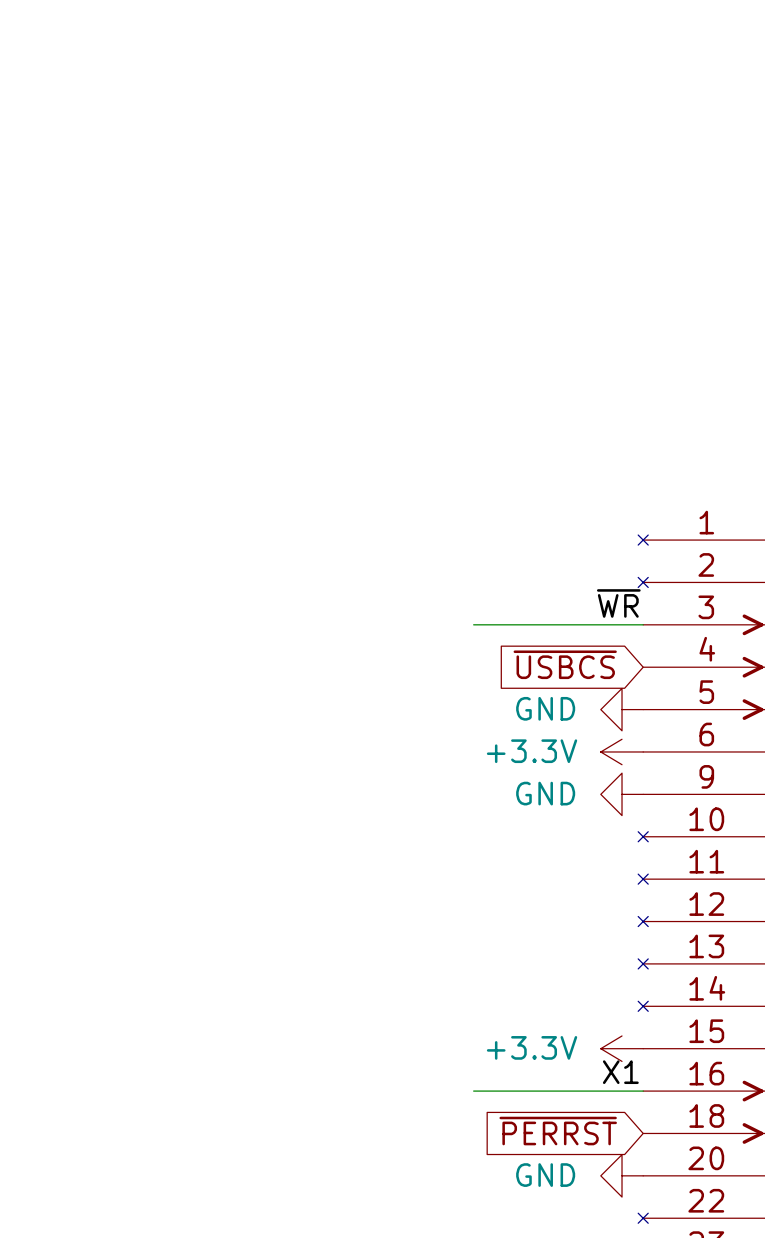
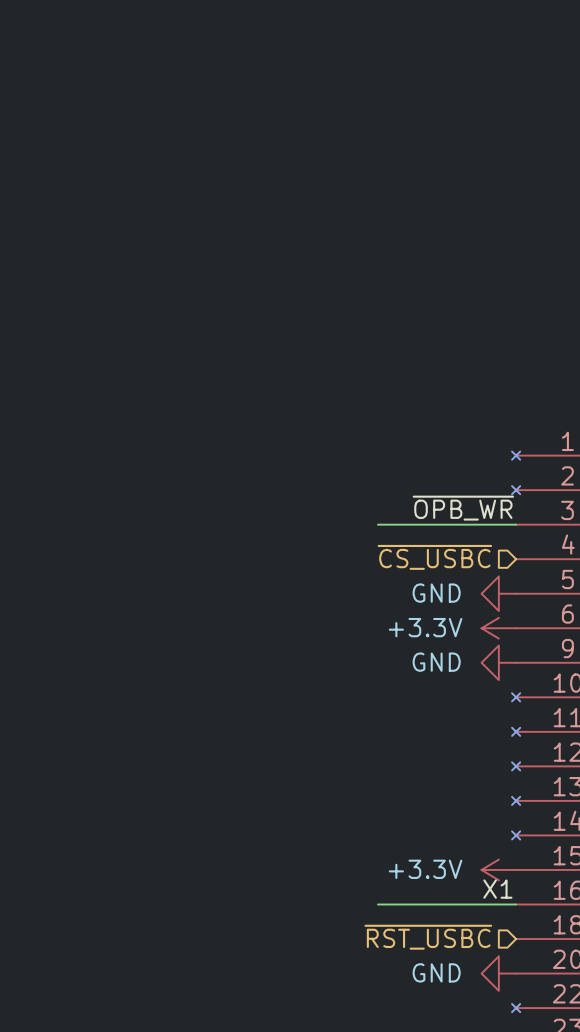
label: ~{WR} (618, 603) -> ~{OPB_WR} (463, 508)
hierarchical label: none -> ~{CS_USBC} (434, 557)
global label: ~{USBCS} (565, 664) -> none
hierarchical label: none -> ~{RST_USBC} (428, 937)
global label: ~{PERRST} (558, 1131) -> none

